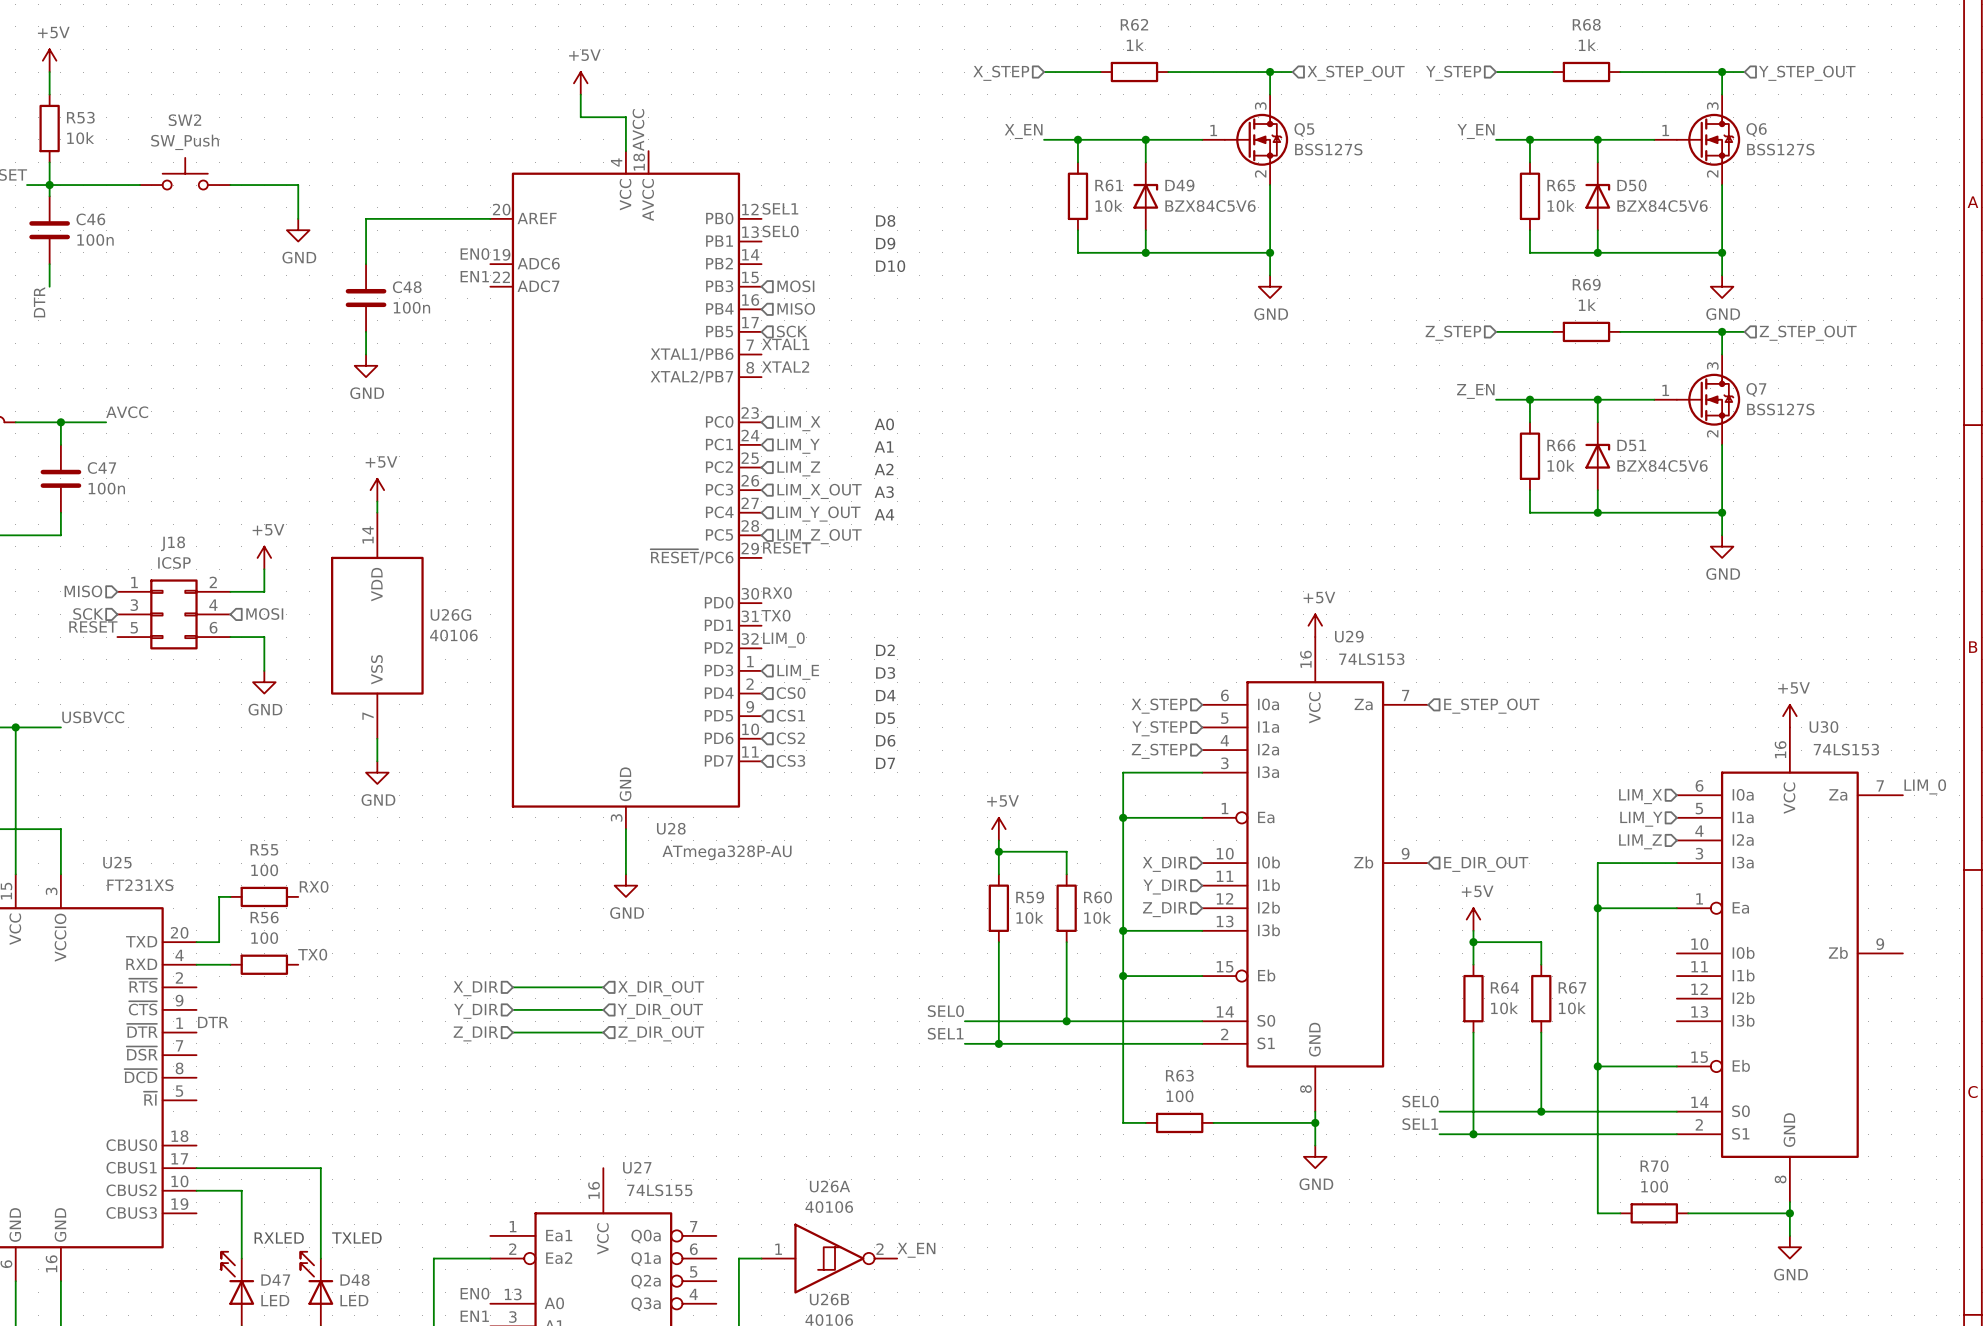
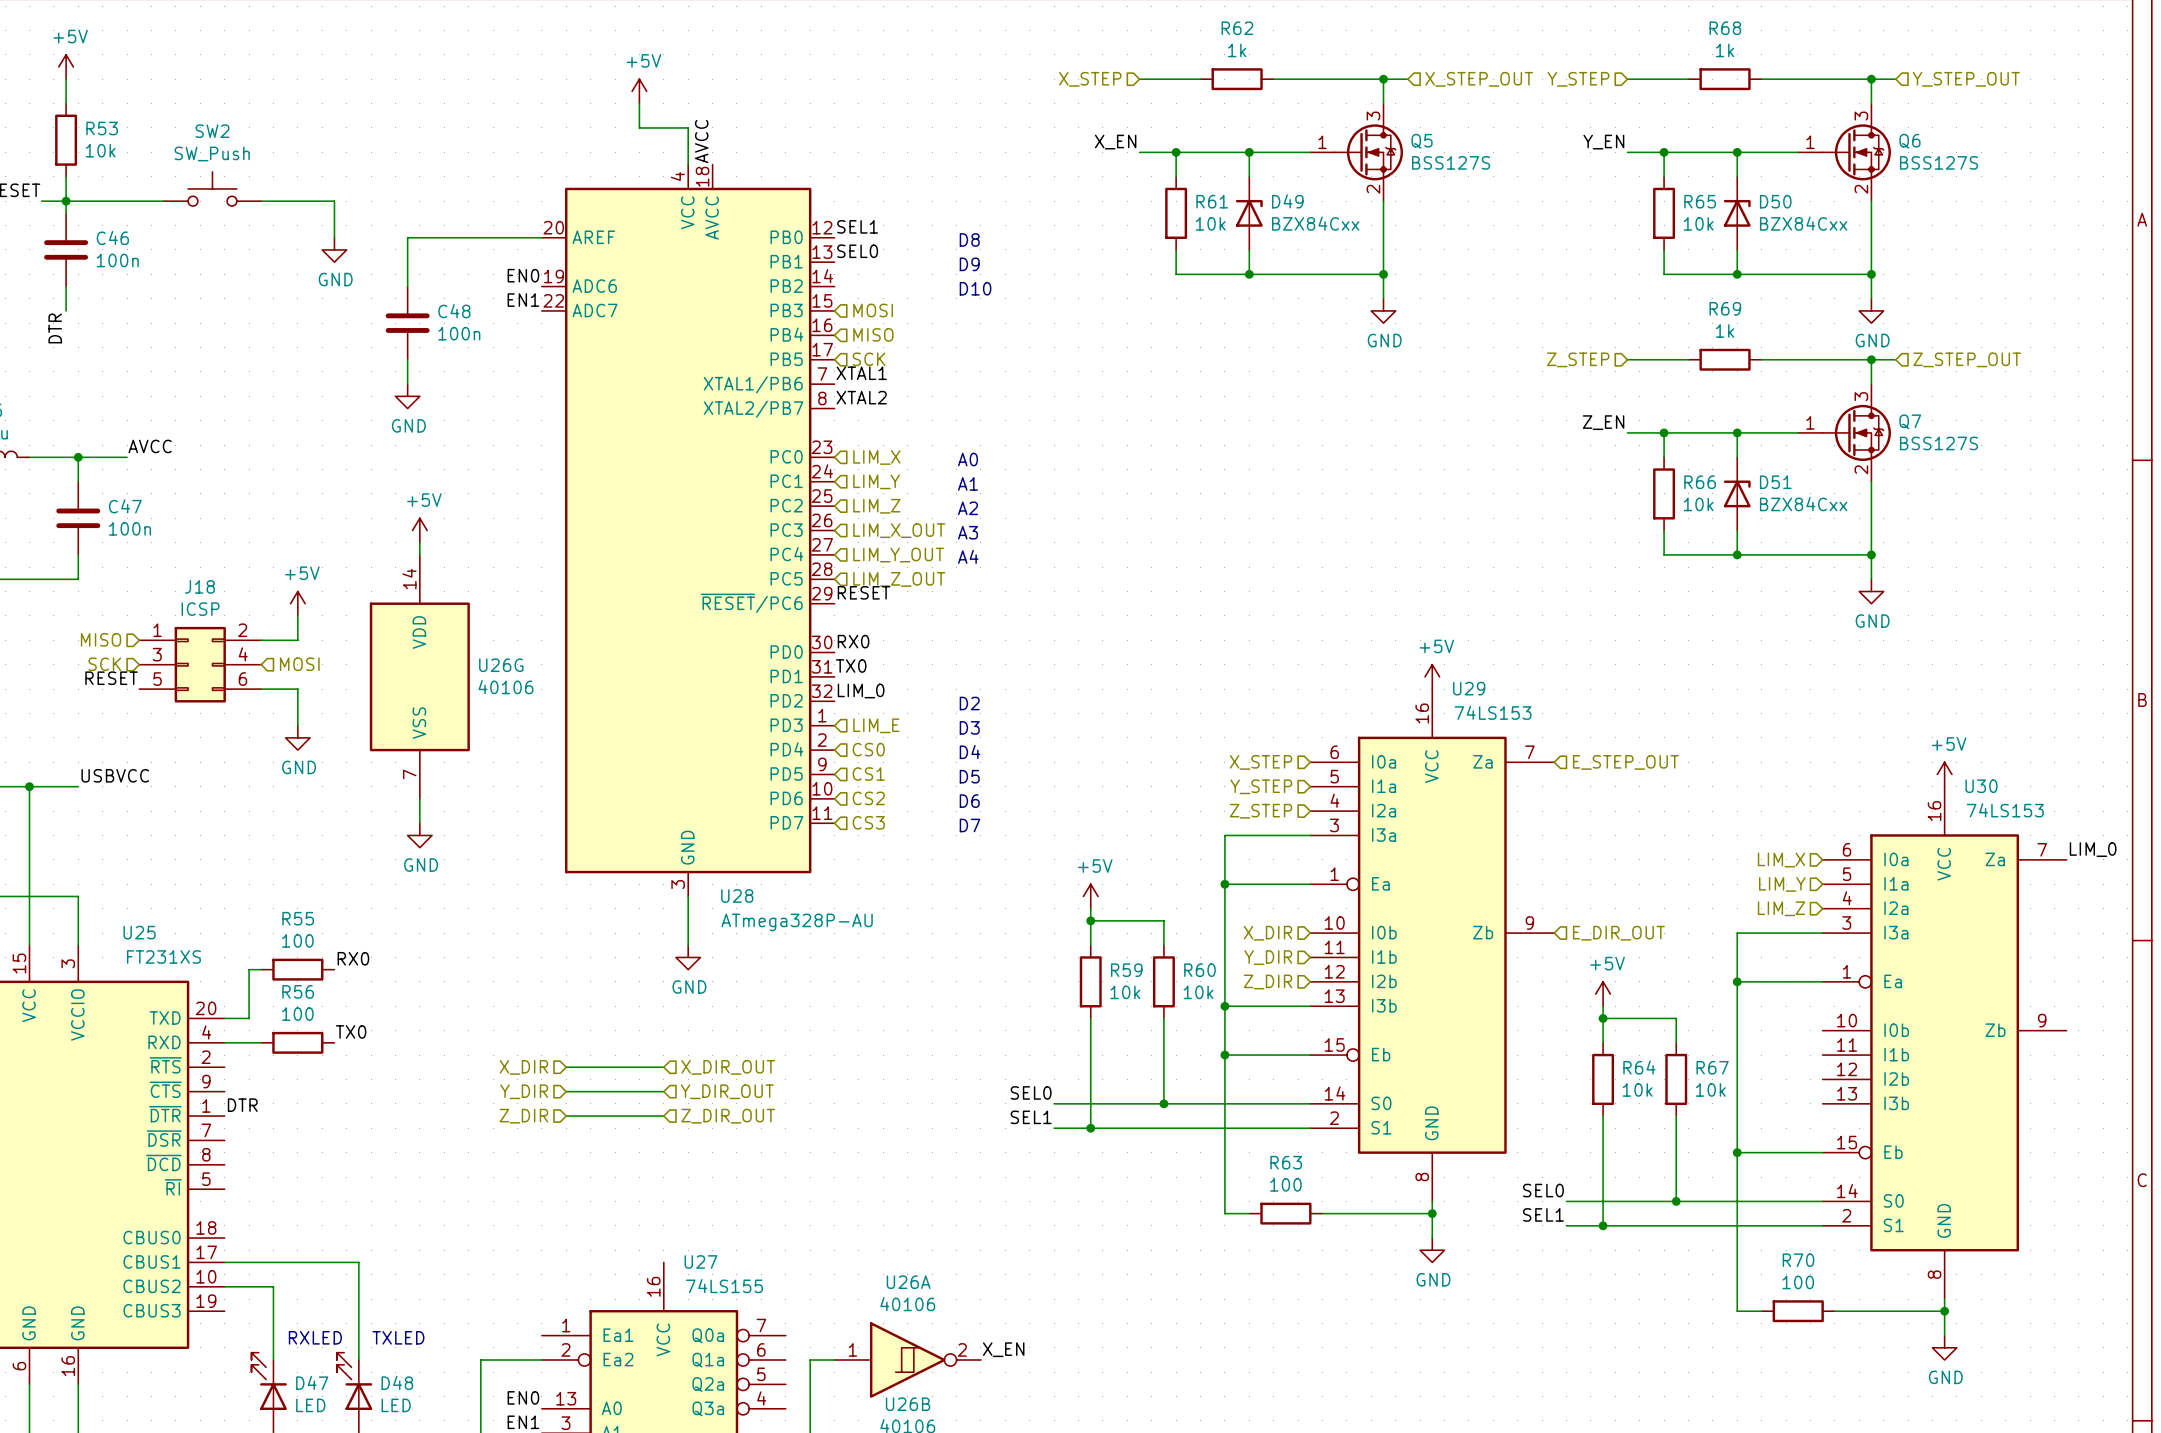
D49 value: BZX84C5V6 (1210, 206) -> BZX84Cxx (1315, 223)
D50 value: BZX84C5V6 (1662, 206) -> BZX84Cxx (1803, 223)
D51 value: BZX84C5V6 (1662, 465) -> BZX84Cxx (1803, 504)

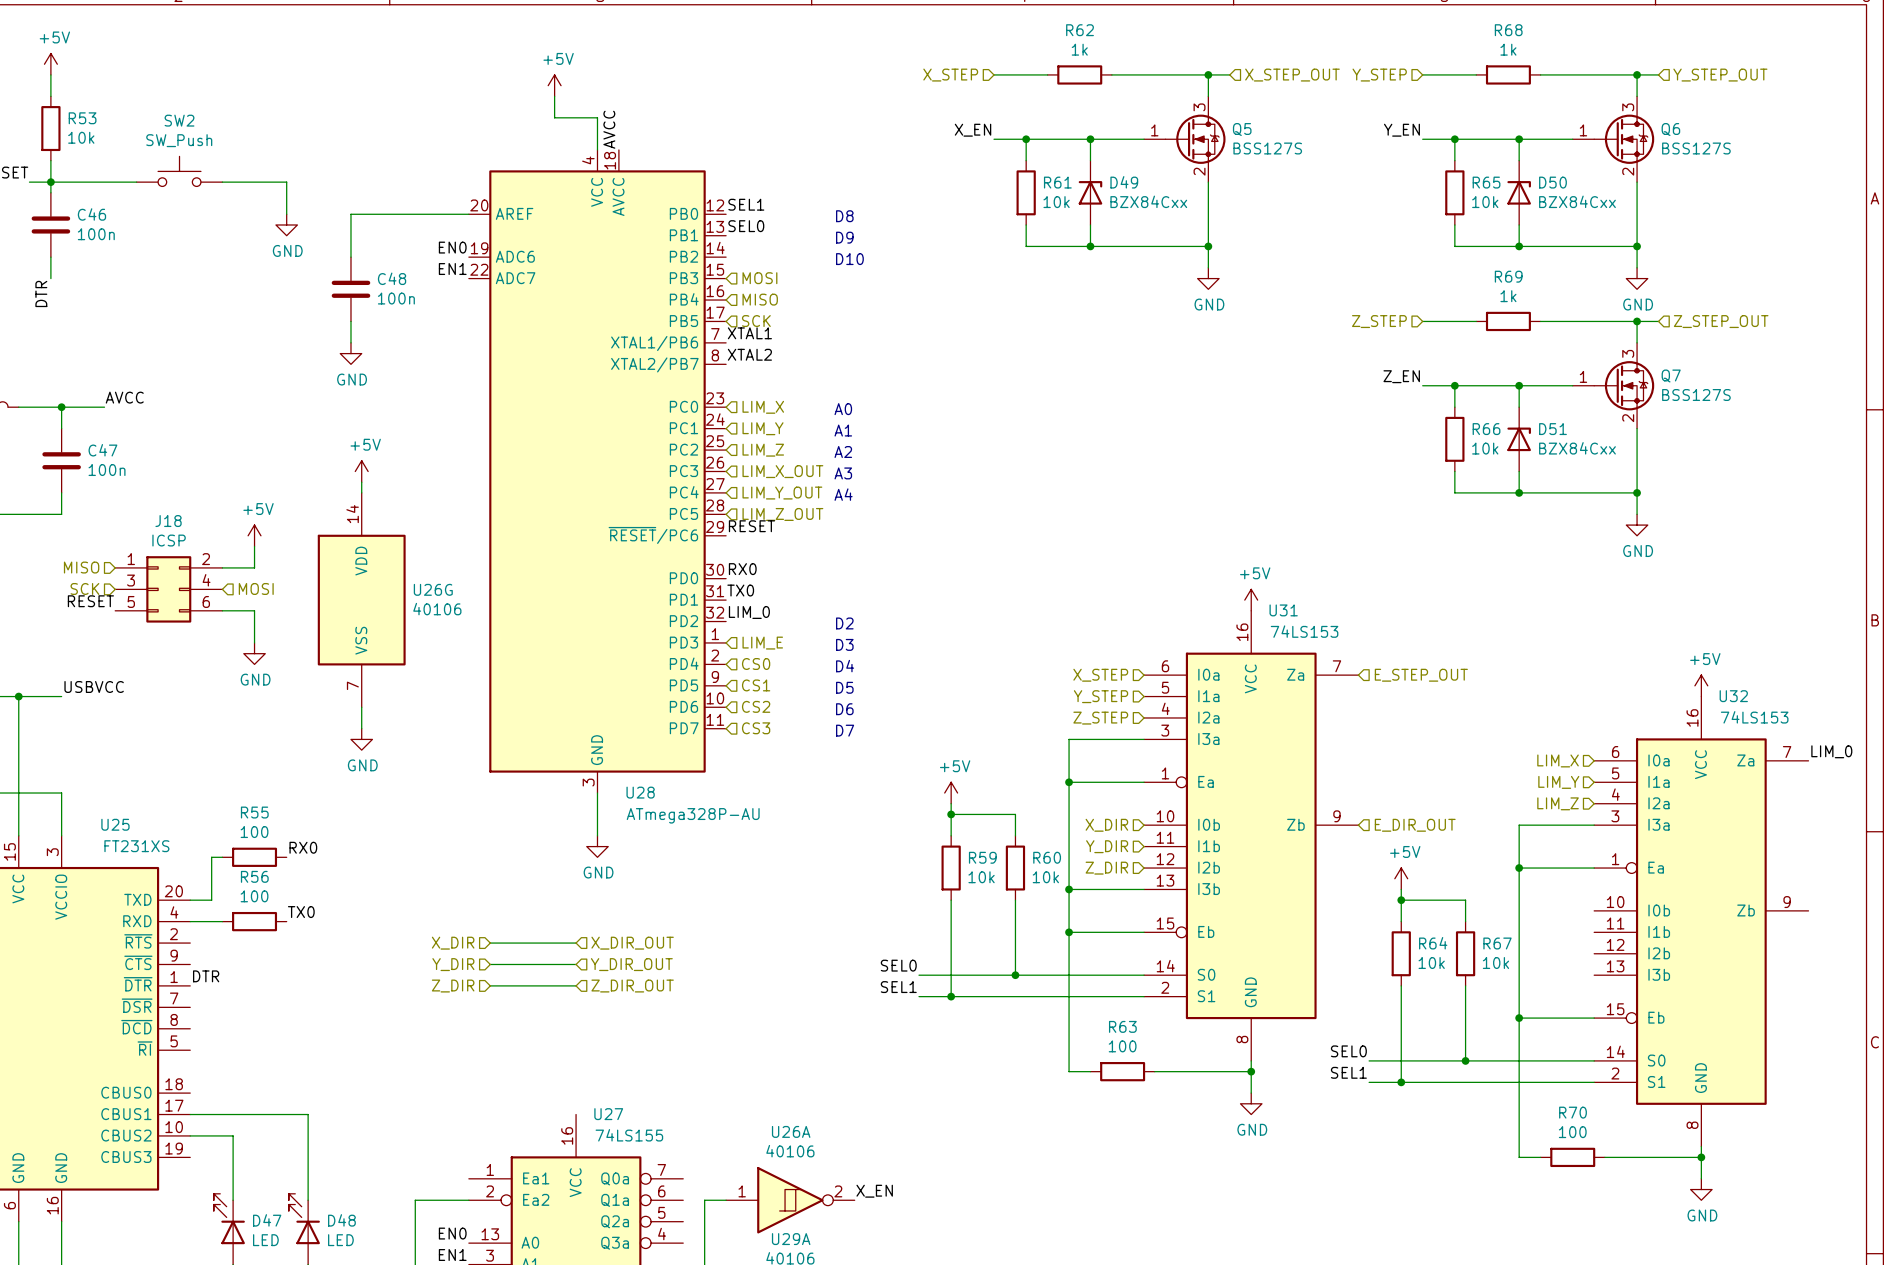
U29 name: U29 (1469, 688) -> U31 (1283, 610)
U30 name: U30 (1981, 786) -> U32 (1733, 696)
text: RXLED (315, 1337) -> none
text: TXLED (398, 1337) -> none
U26B name: U26B (908, 1404) -> U29A (791, 1239)

